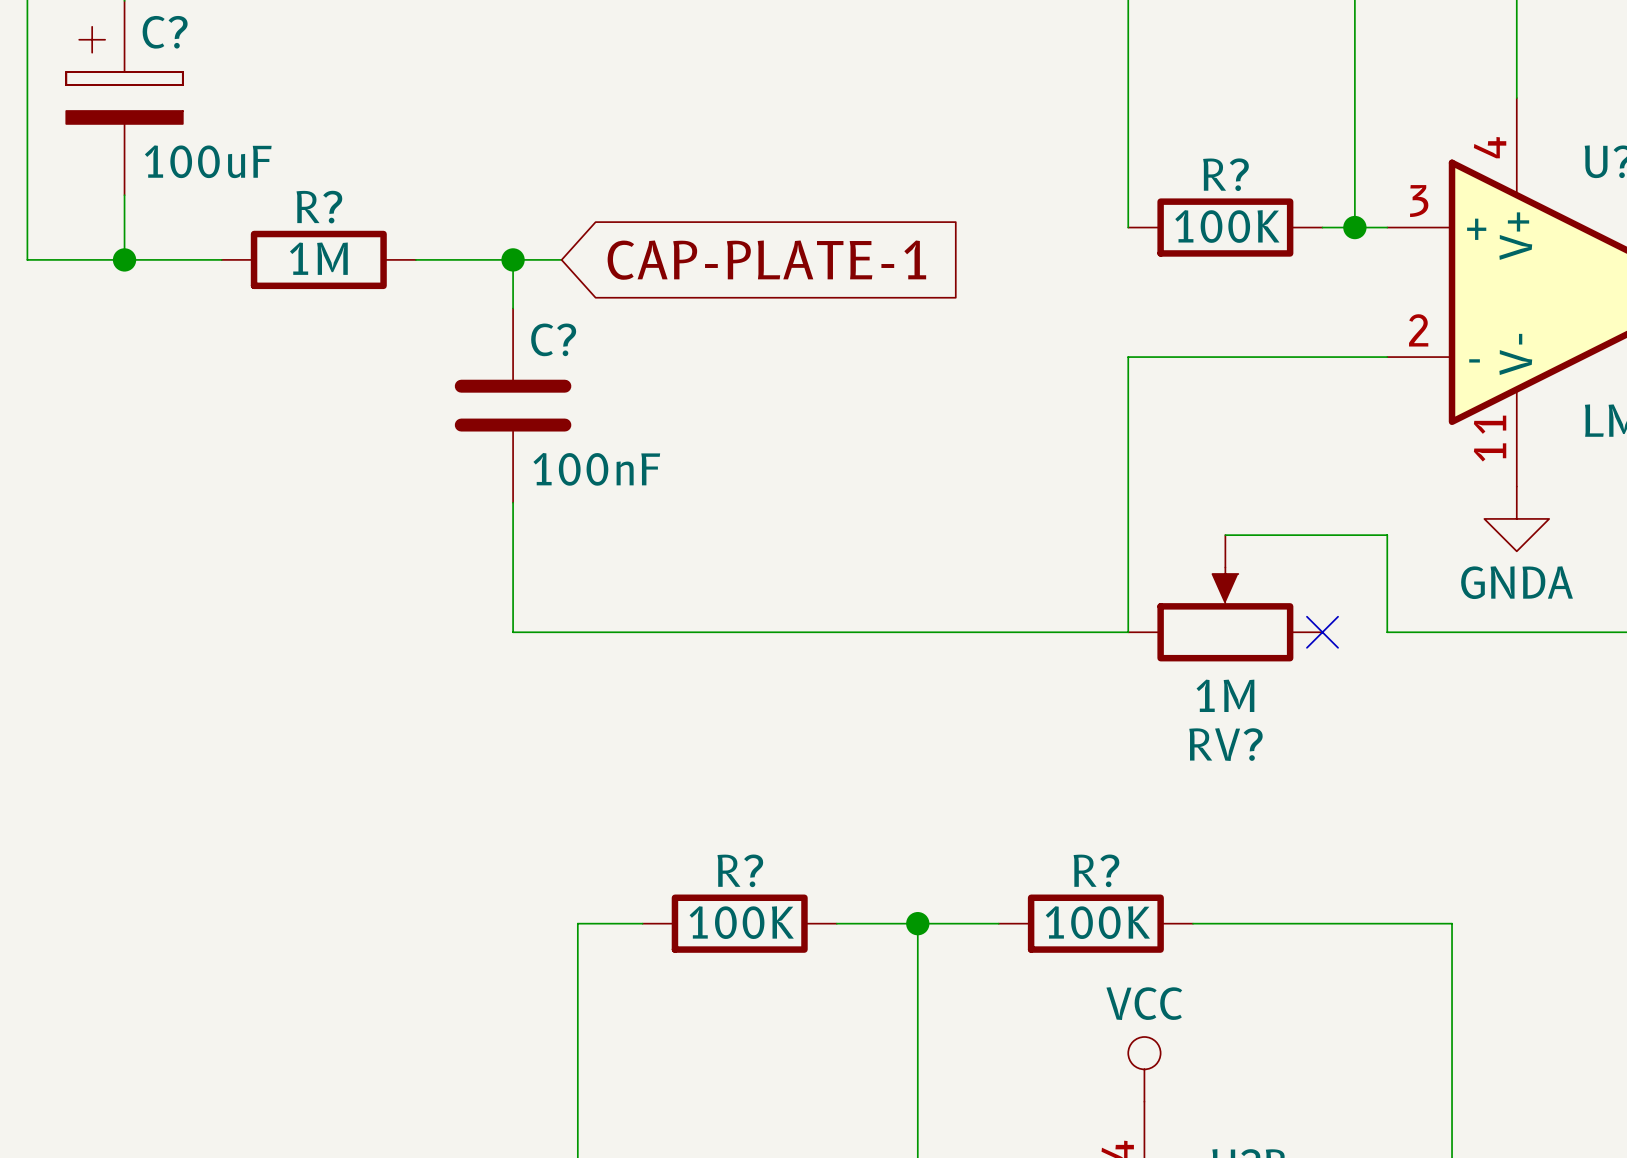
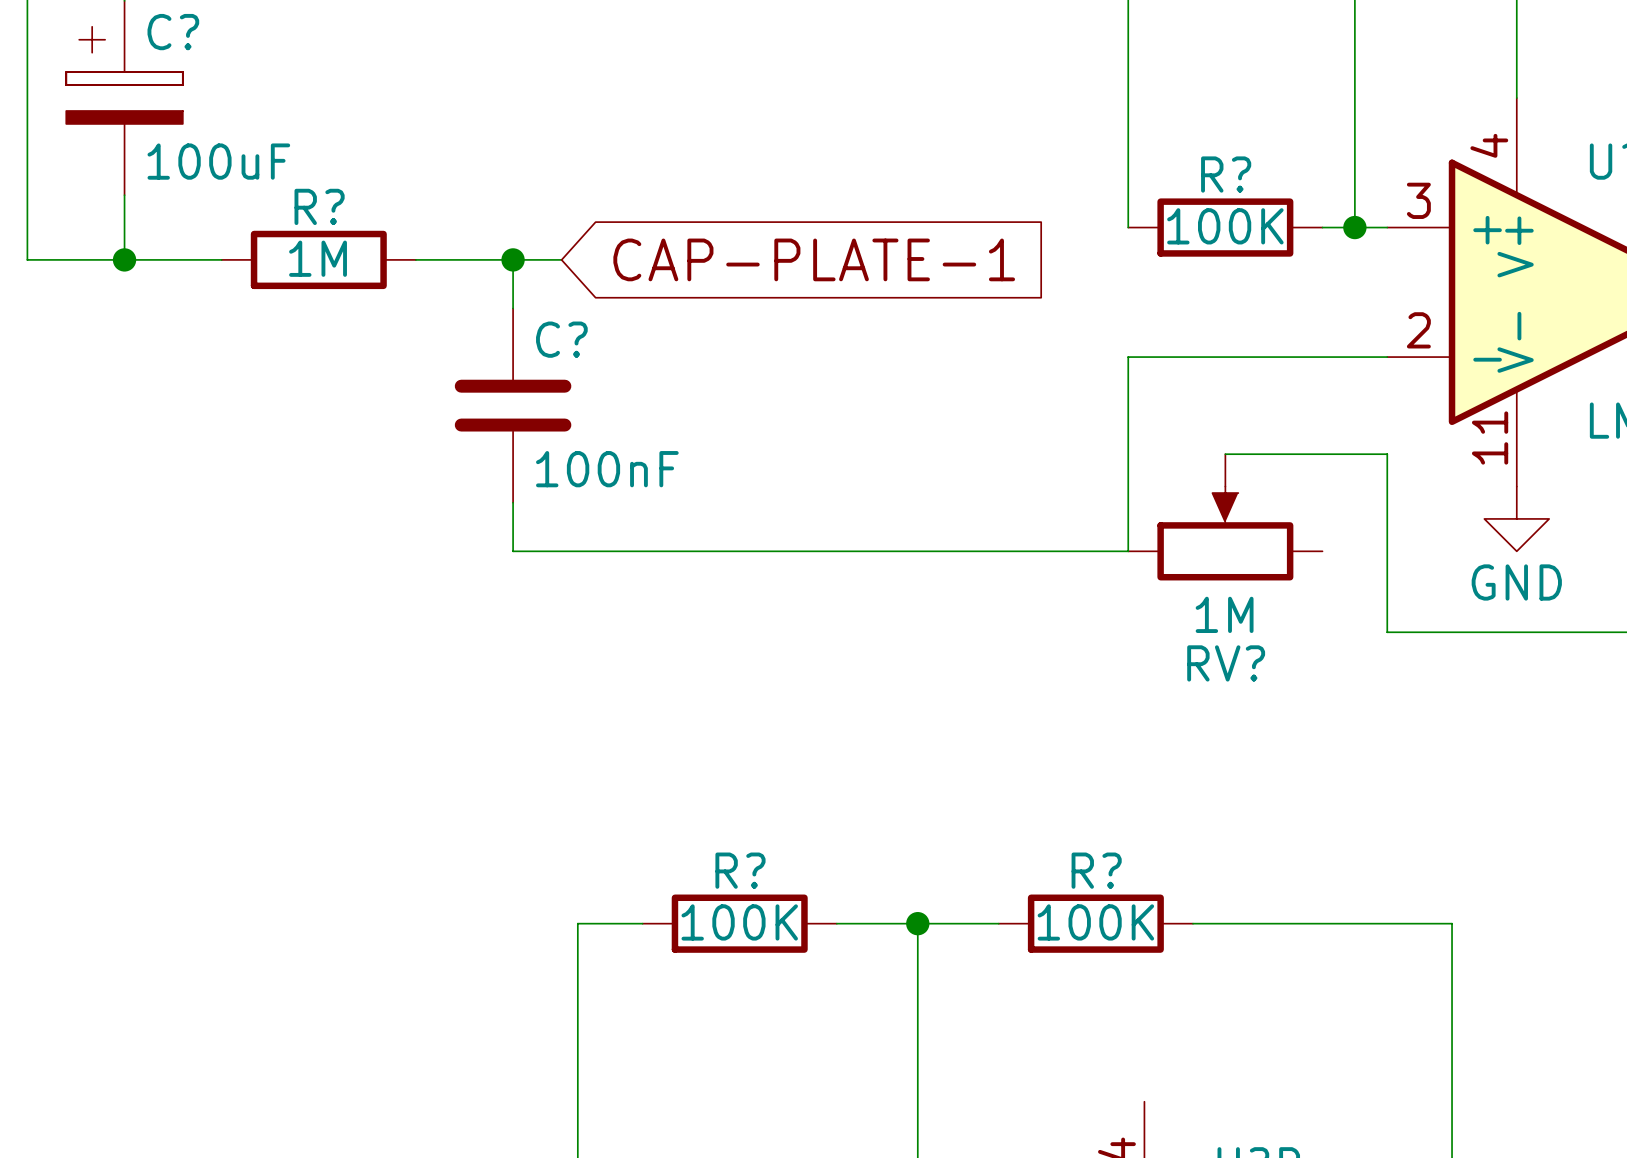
power symbol: GNDA (1516, 518) -> GND (1516, 518)
wire: (1225, 535) (1387, 535) -> (1225, 454) (1387, 454) (1387, 535)
wire: (513, 551) (513, 632) (1128, 632) (1128, 551) -> (513, 551) (1128, 551)
RV? position: (1225, 598) -> (1225, 517)
no-connect mark: (1322, 632) -> none
power symbol: VCC (1144, 1069) -> none

